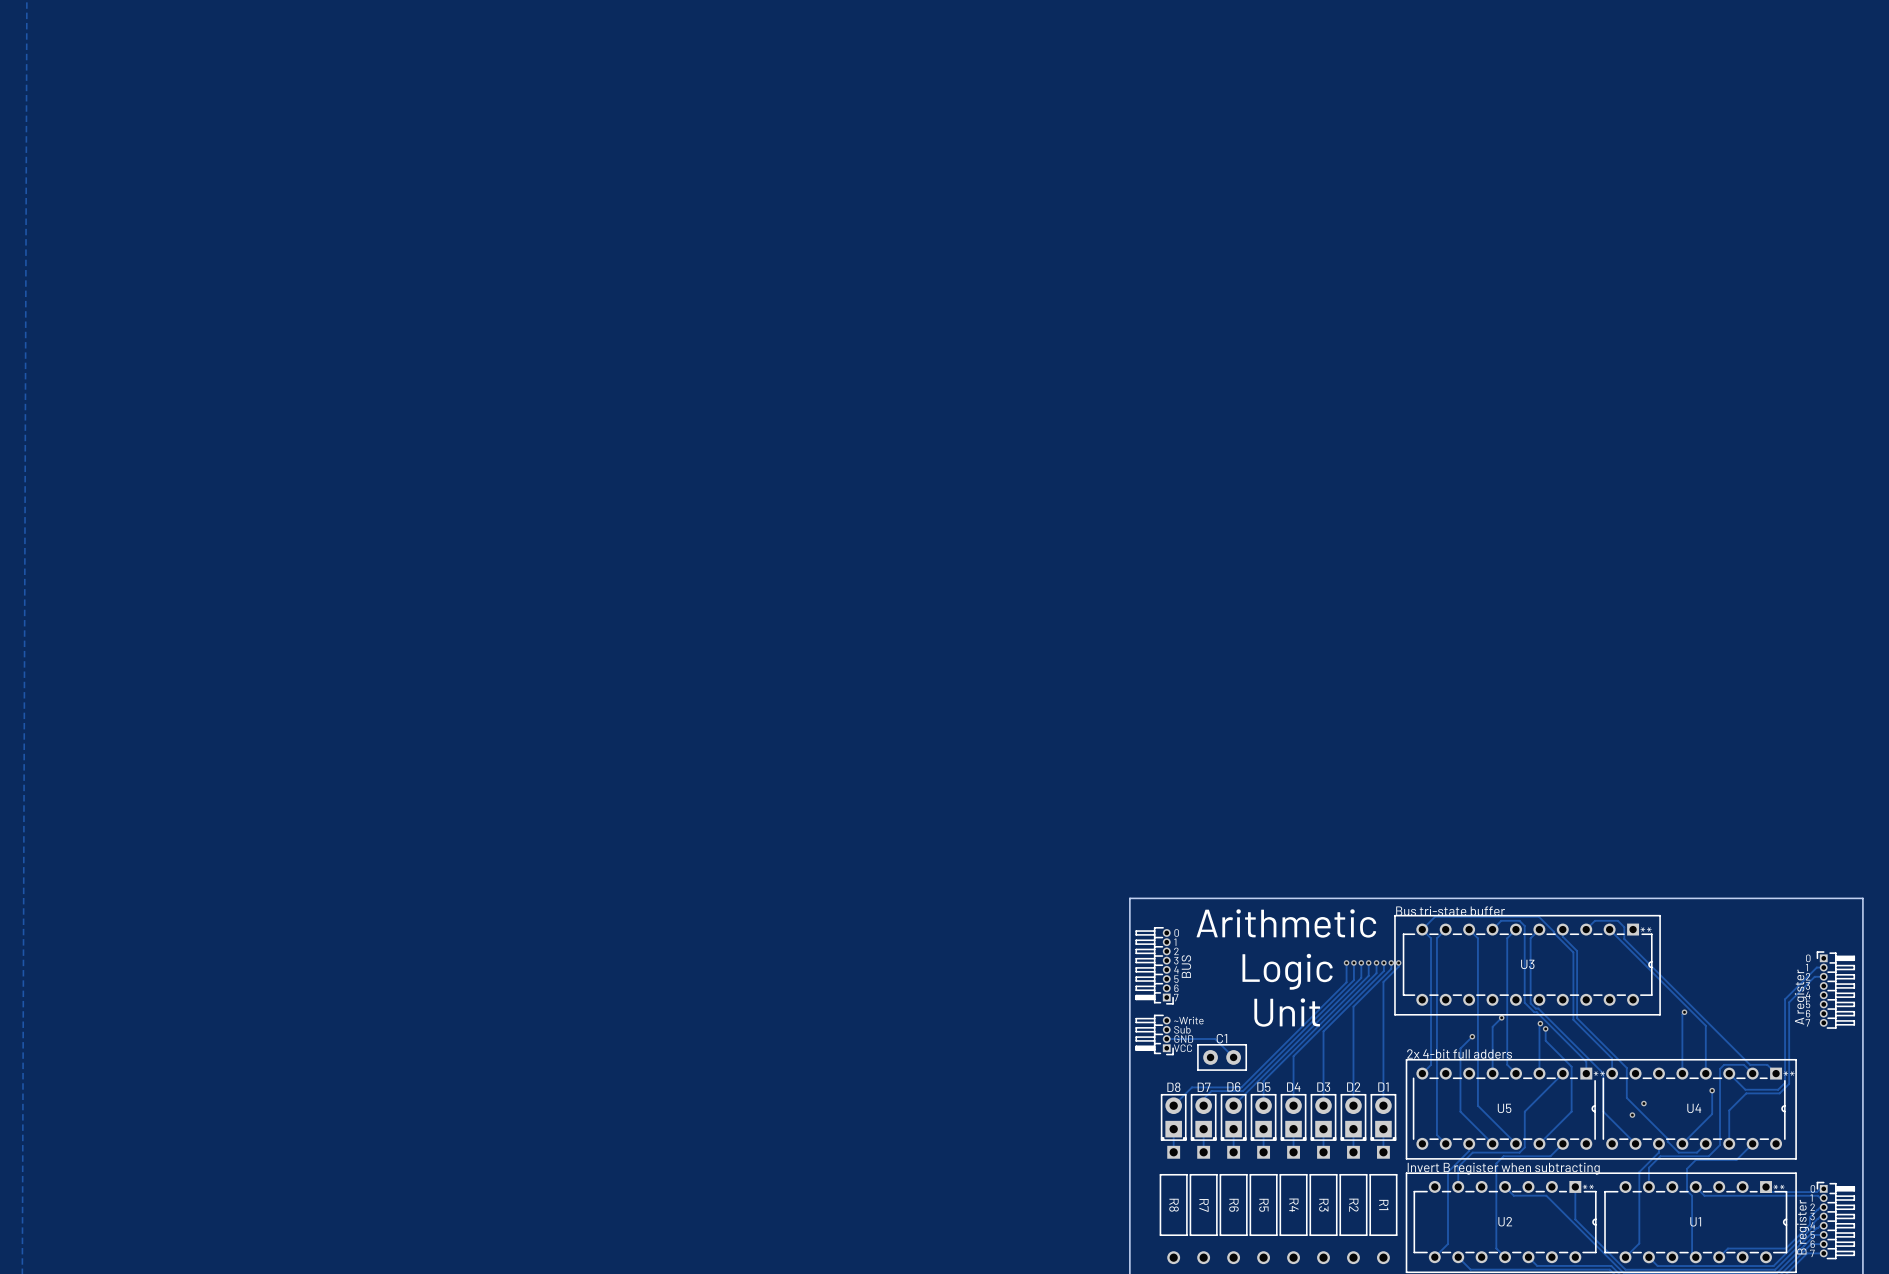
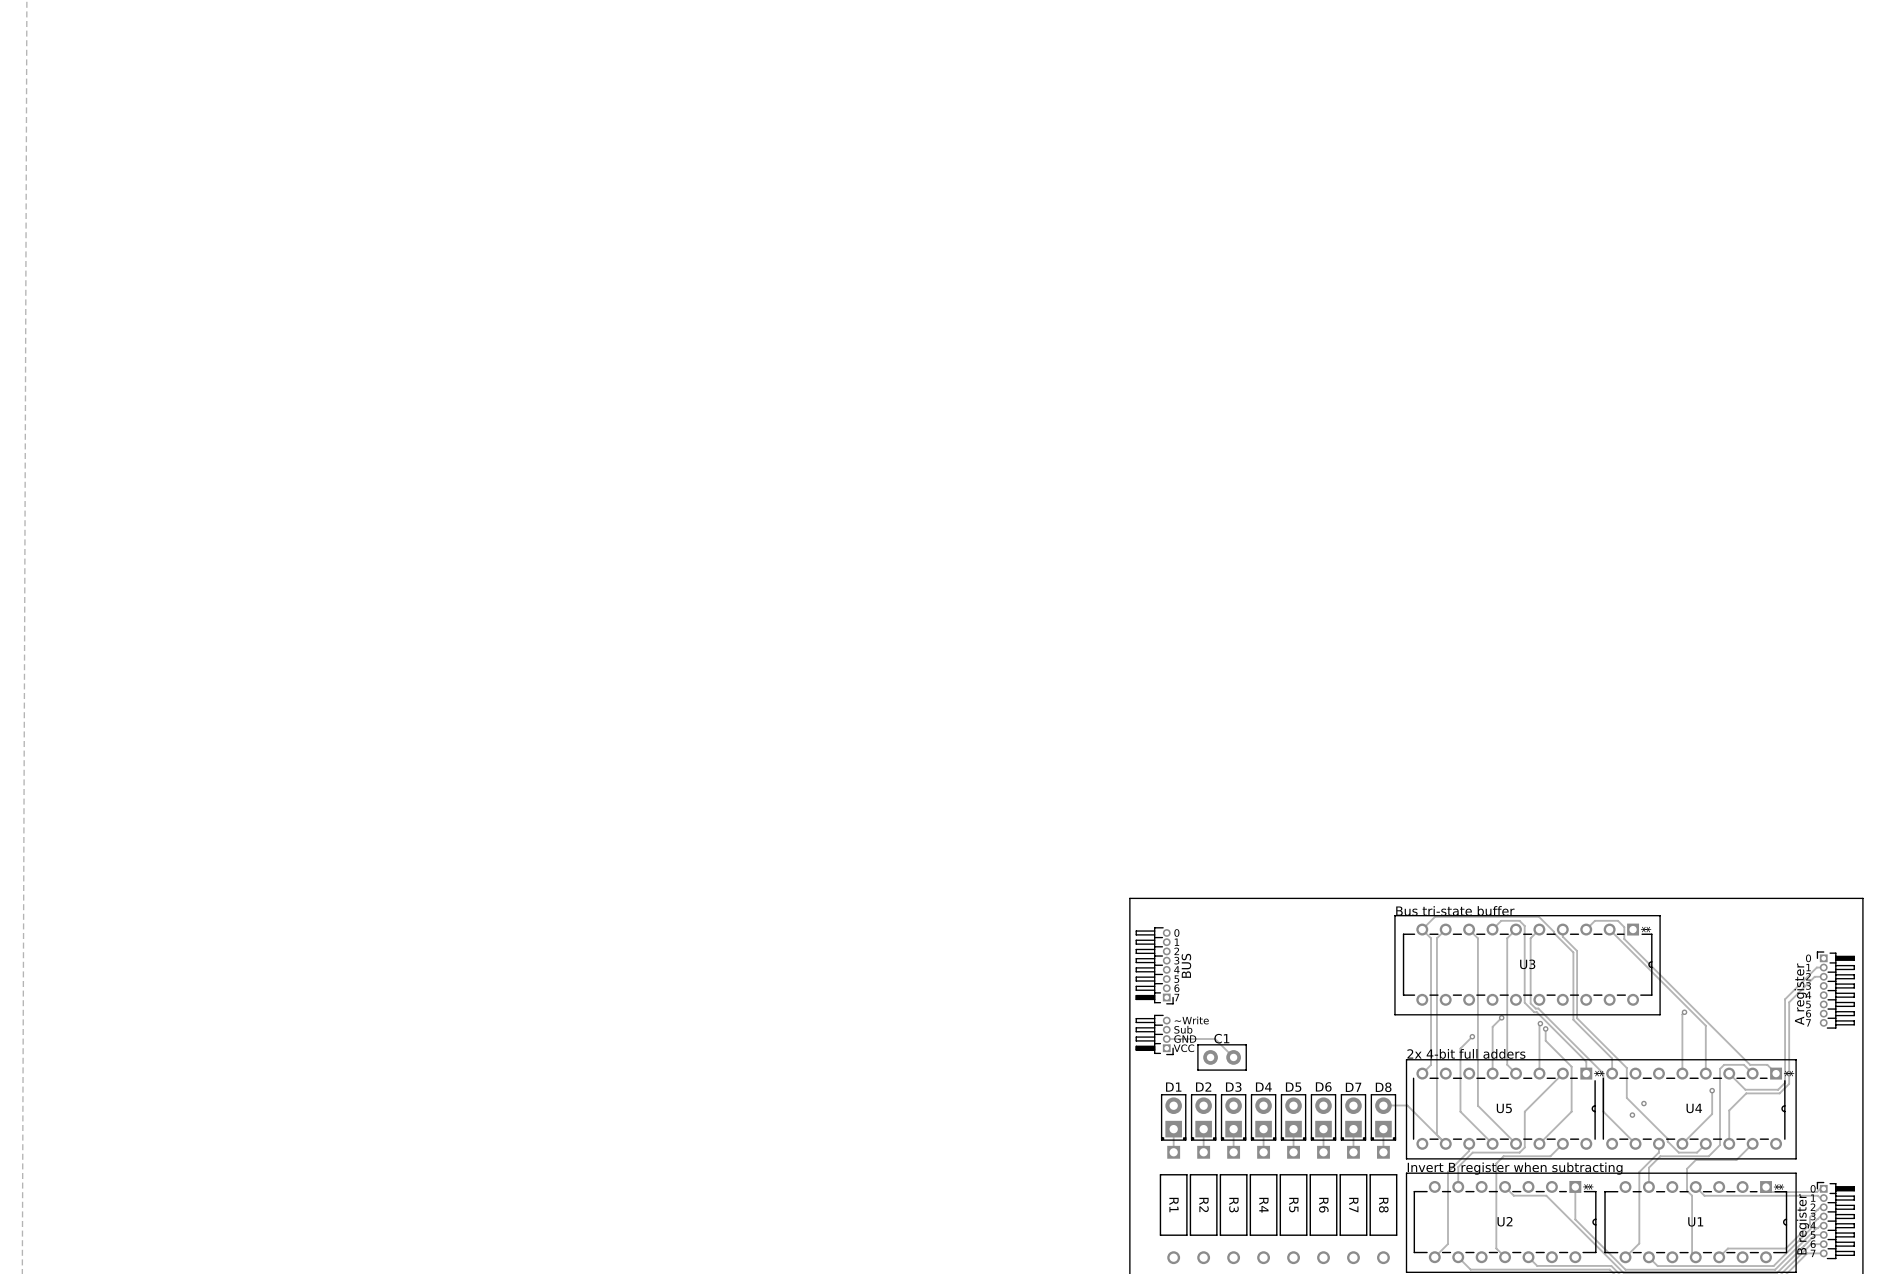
text: Arithmetic (1286, 923) -> none
track: (1346, 962) (1346, 982) (1241, 1087) (1191, 1087) (1173, 1105) -> none
via: (1346, 962) -> none
track: (1353, 962) (1353, 980) (1243, 1091) (1211, 1091) (1203, 1098) (1203, 1105) -> none
via: (1353, 962) -> none
track: (1361, 962) (1361, 978) (1233, 1105) -> none
via: (1361, 962) -> none
track: (1368, 962) (1368, 975) (1263, 1080) (1263, 1105) -> none
via: (1368, 962) -> none
track: (1376, 962) (1376, 973) (1293, 1056) (1293, 1105) -> none
via: (1376, 962) -> none
track: (1383, 962) (1383, 971) (1323, 1031) (1323, 1105) -> none
via: (1383, 962) -> none
track: (1391, 962) (1391, 968) (1353, 1006) (1353, 1105) -> none
via: (1391, 962) -> none
track: (1398, 962) (1398, 966) (1383, 981) (1383, 1105) -> (1436, 1135) (1407, 1105) (1383, 1105)
via: (1398, 962) -> none
text: Logic (1287, 971) -> none
text: Unit (1287, 1012) -> none
D6 name: D6 (1233, 1086) -> D3 (1233, 1087)
D8 name: D8 (1173, 1087) -> D1 (1173, 1087)
D7 name: D7 (1204, 1087) -> D2 (1203, 1086)
D5 name: D5 (1263, 1087) -> D4 (1263, 1087)
D4 name: D4 (1293, 1087) -> D5 (1293, 1087)
D3 name: D3 (1323, 1087) -> D6 (1323, 1086)
D2 name: D2 (1353, 1087) -> D7 (1353, 1087)
D1 name: D1 (1383, 1087) -> D8 (1383, 1087)
R1 name: R1 (1383, 1204) -> R8 (1383, 1205)
R8 name: R8 (1174, 1205) -> R1 (1174, 1205)
R7 name: R7 (1203, 1205) -> R2 (1204, 1204)
R6 name: R6 (1233, 1205) -> R3 (1233, 1205)
R5 name: R5 (1263, 1205) -> R4 (1263, 1205)
R4 name: R4 (1293, 1205) -> R5 (1293, 1205)
R3 name: R3 (1323, 1205) -> R6 (1323, 1205)
R2 name: R2 (1353, 1205) -> R7 (1353, 1205)

